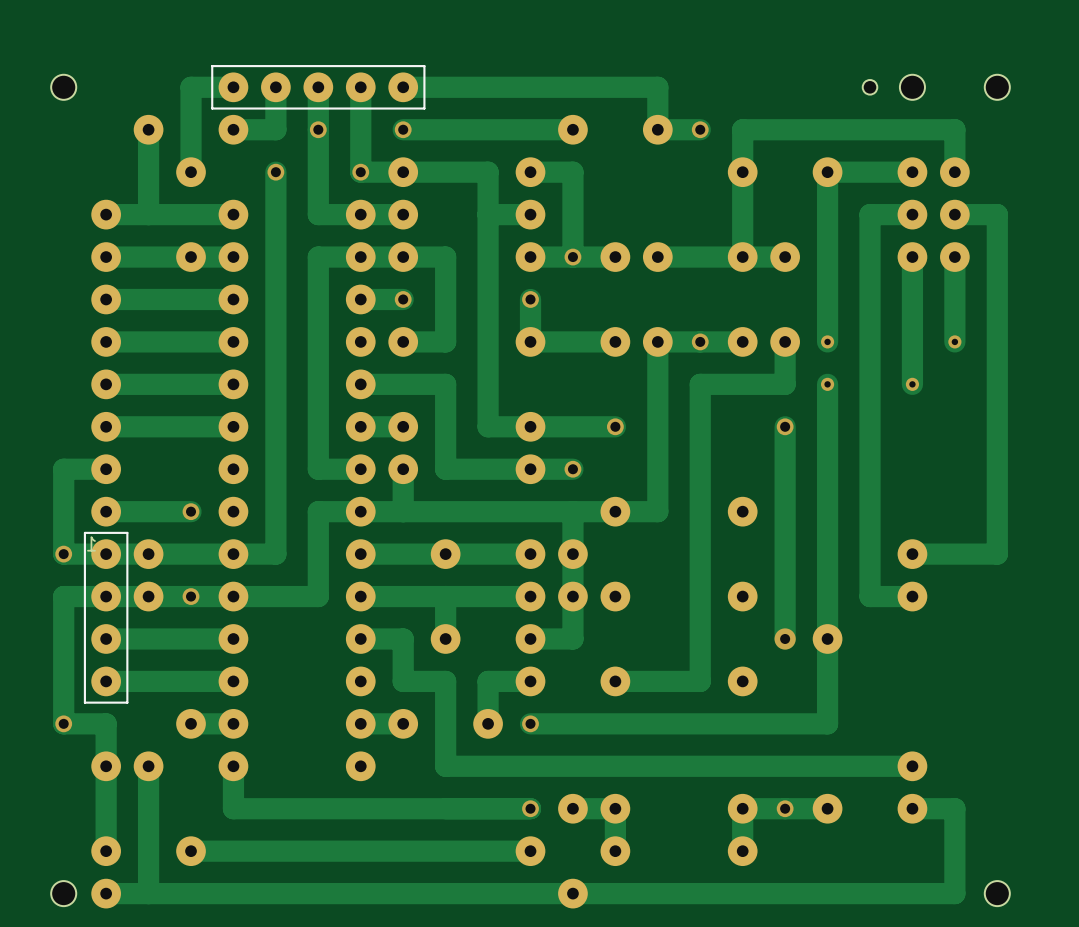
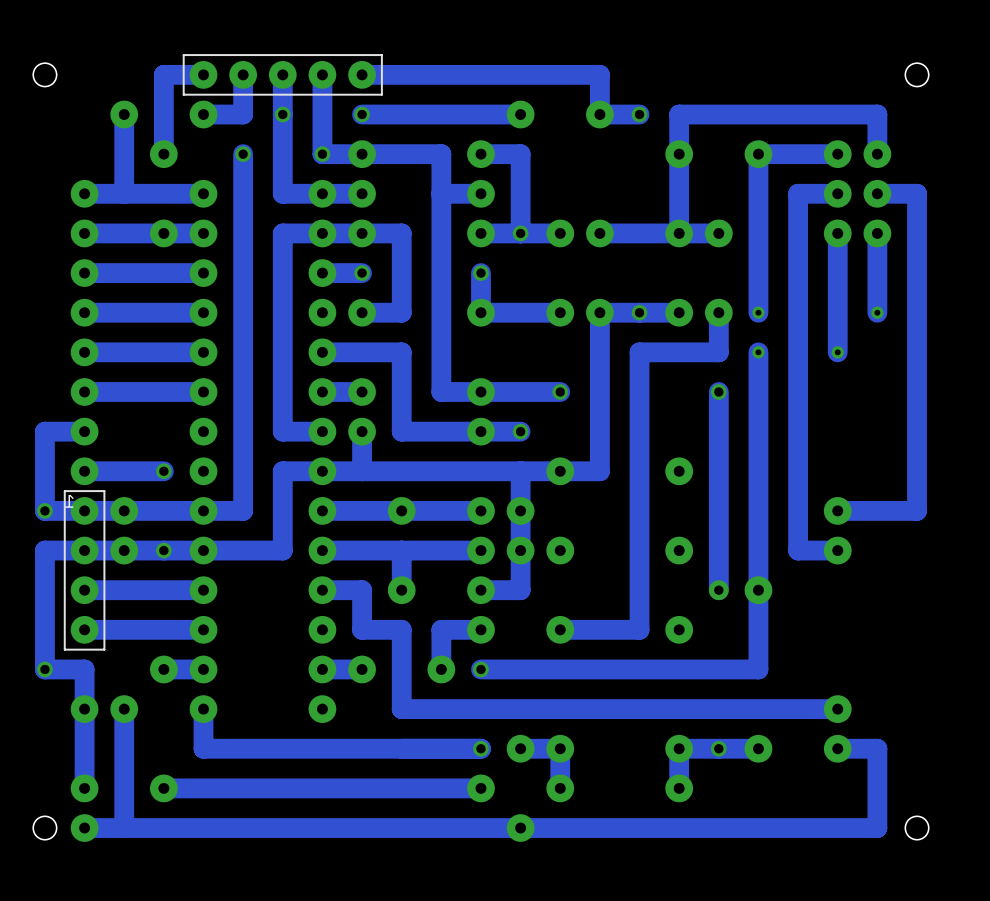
hole: (870, 87) -> none
hole: (912, 87) -> none

